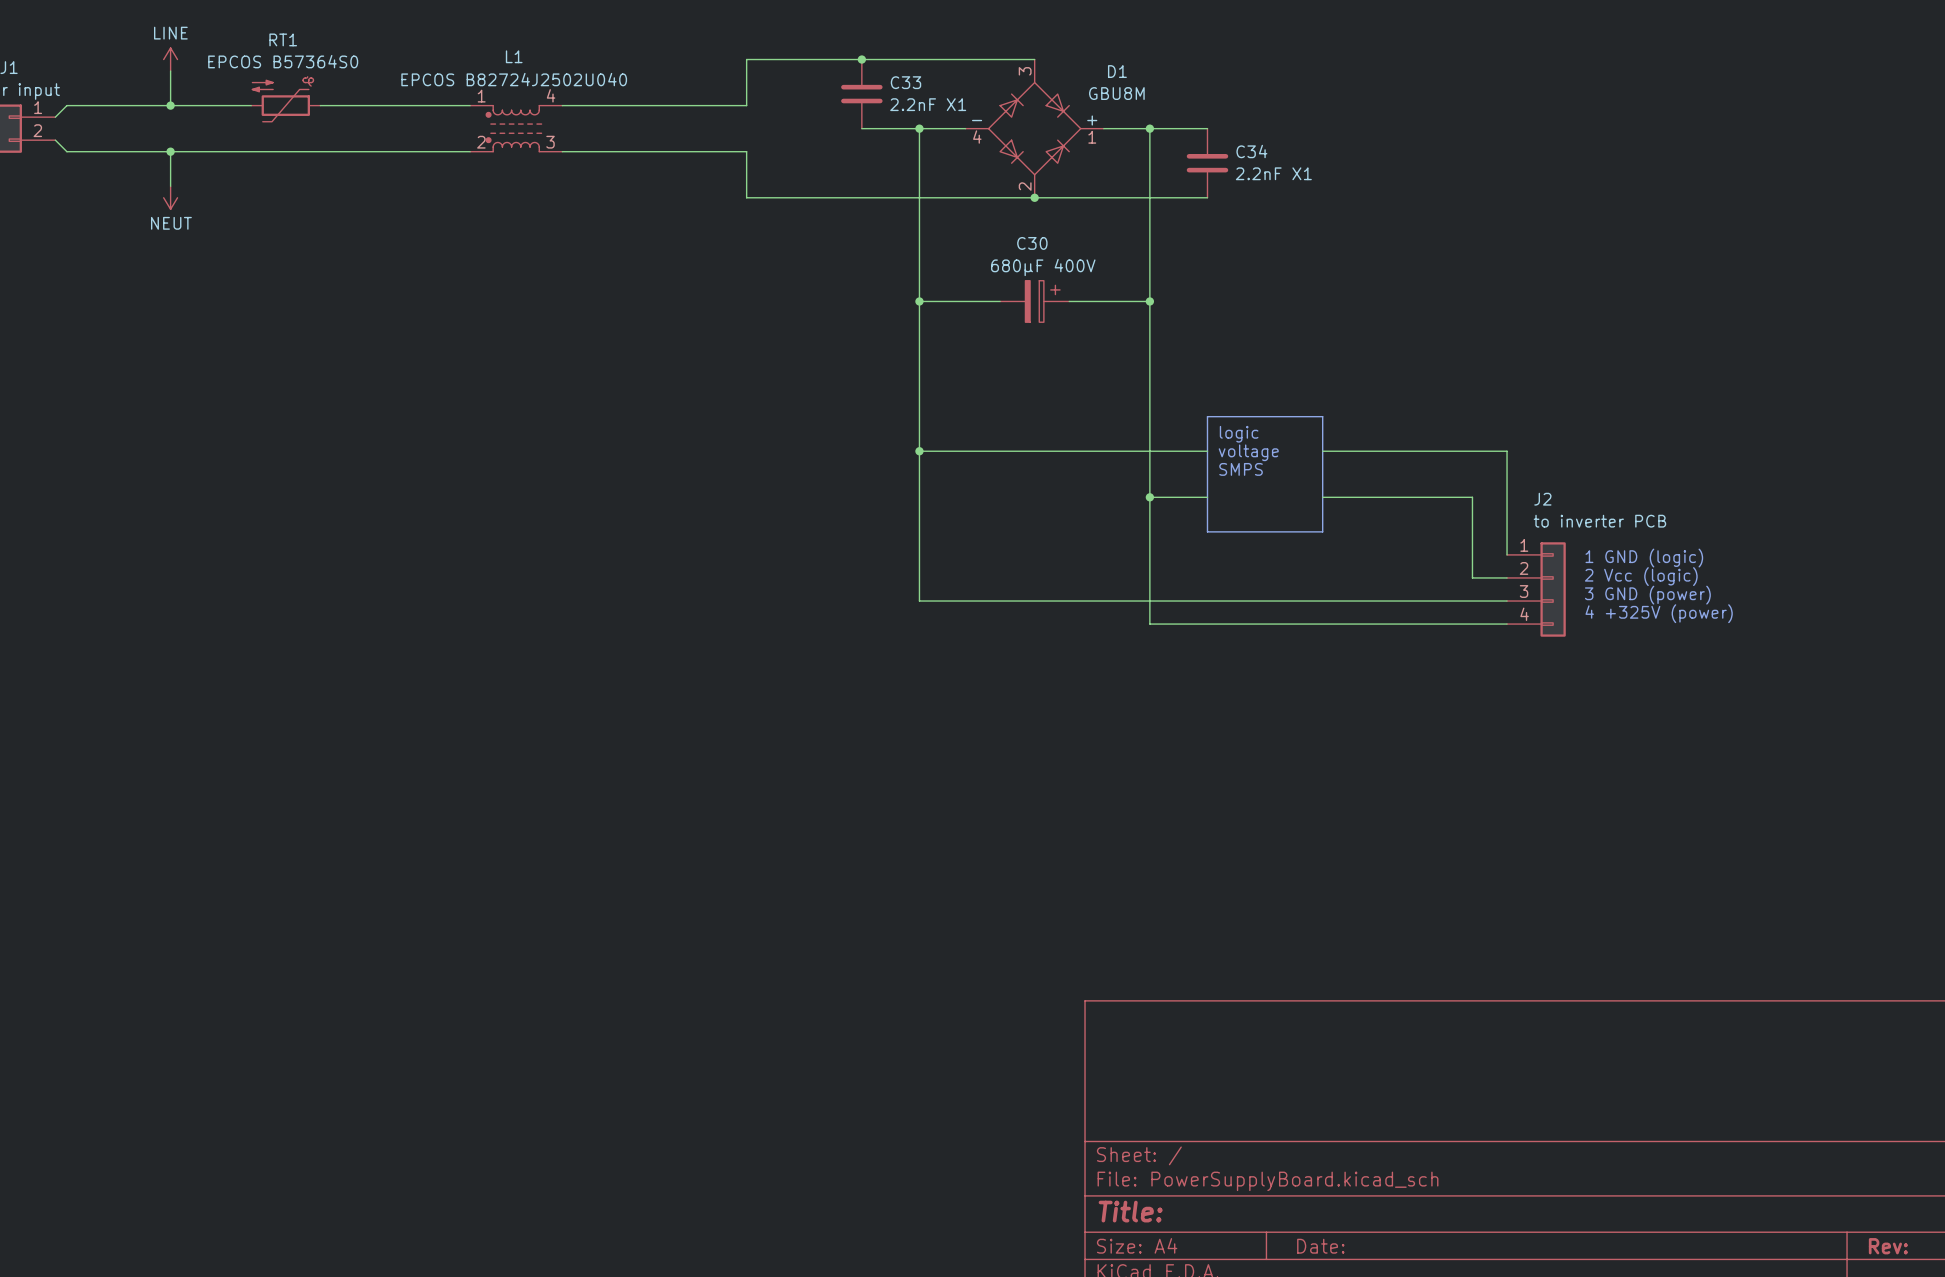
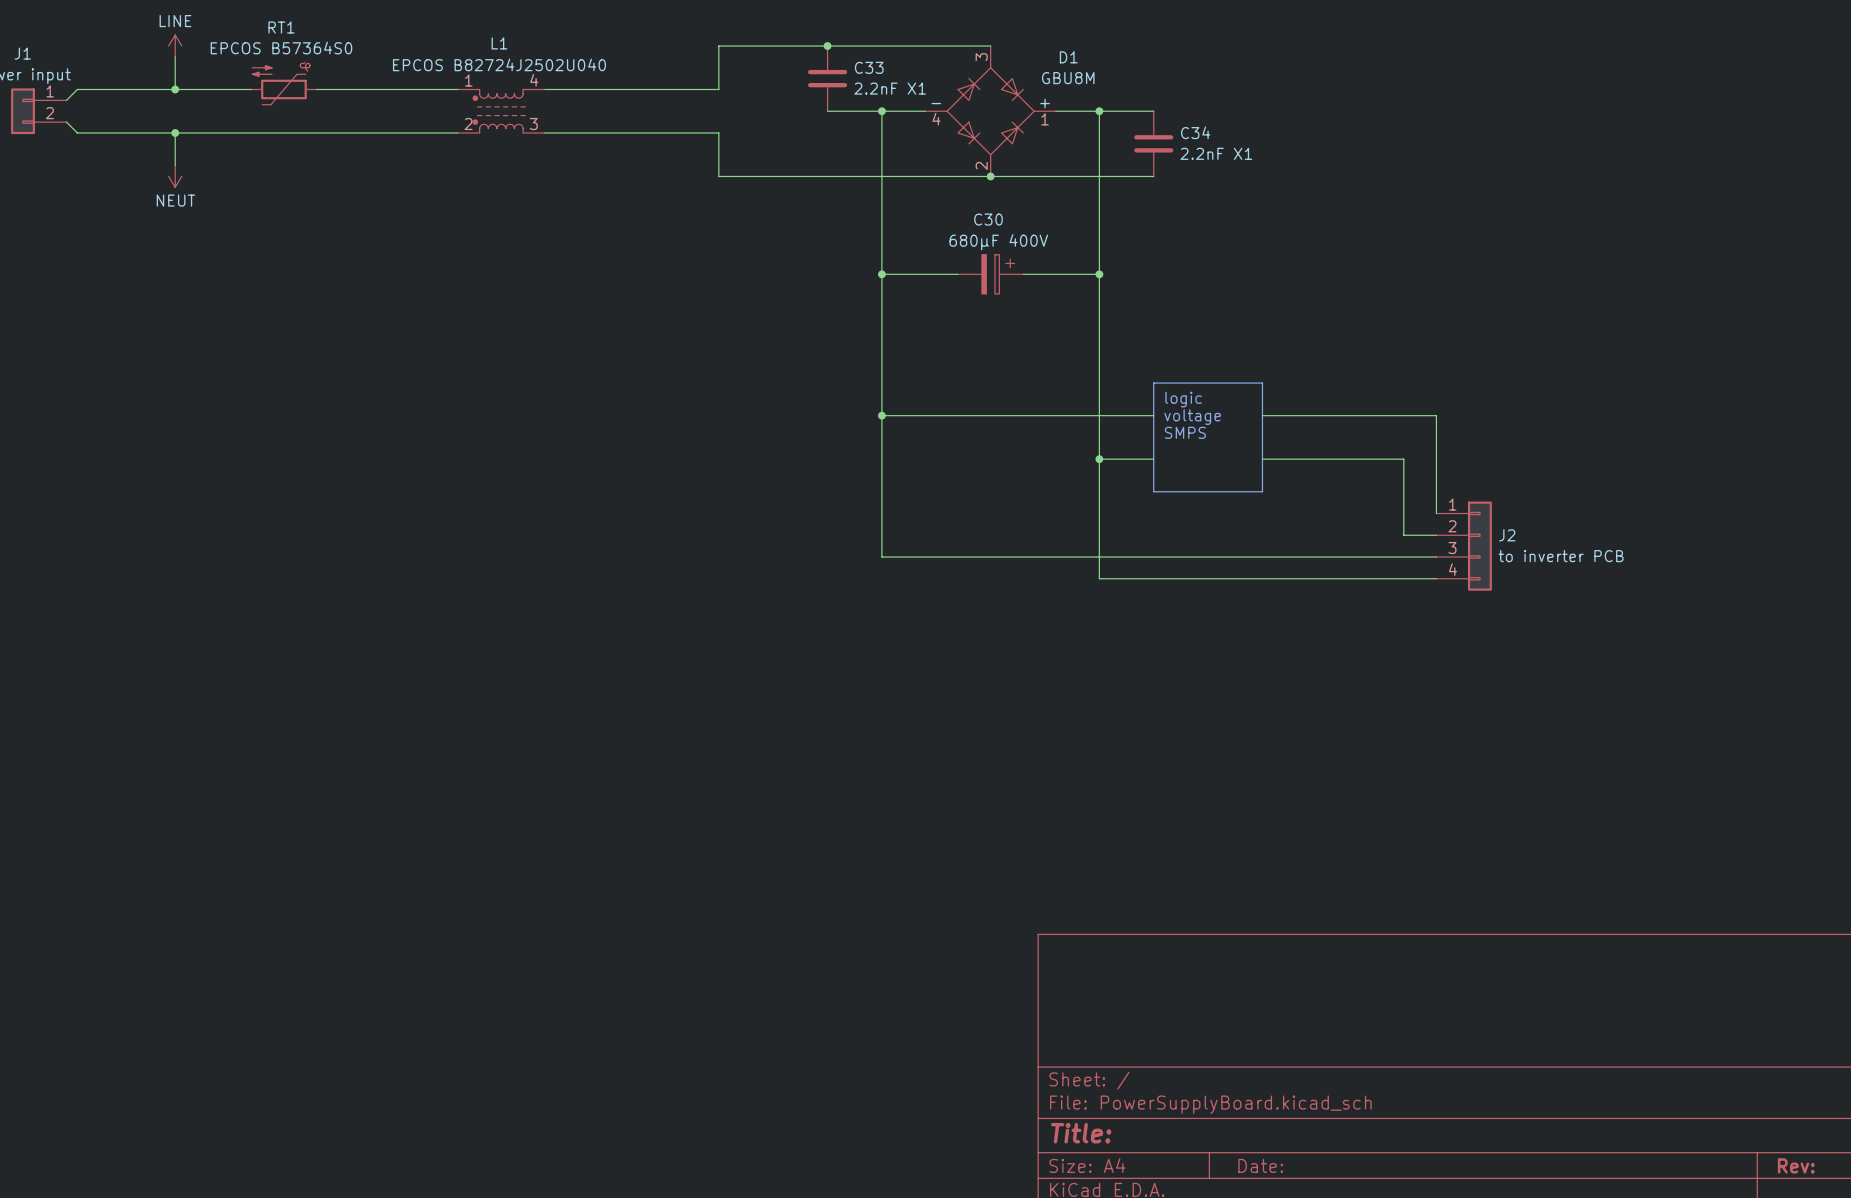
J2 name position: J2 (1542, 499) -> J2 (1507, 535)
J2 value position: to inverter PCB (1599, 521) -> to inverter PCB (1561, 556)
text: 1 GND (logic) (1644, 558) -> none
text: 2 Vcc (logic) (1641, 576) -> none
text: 3 GND (power) (1647, 595) -> none
text: 4 +325V (power) (1659, 613) -> none

